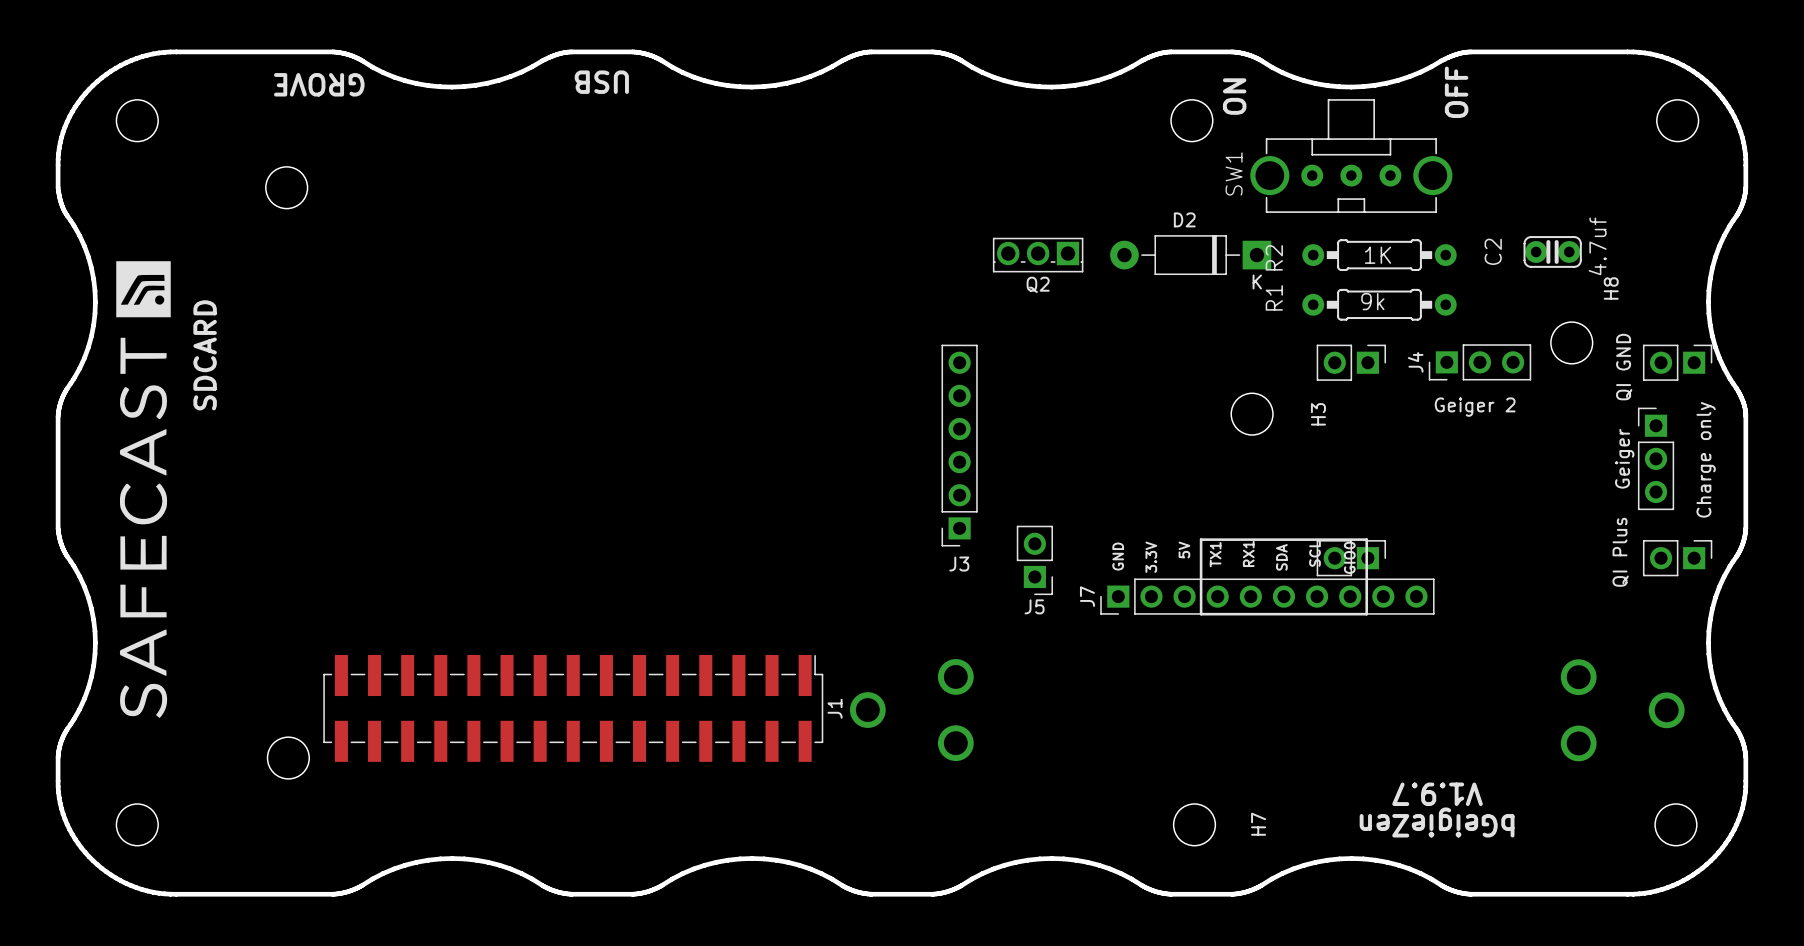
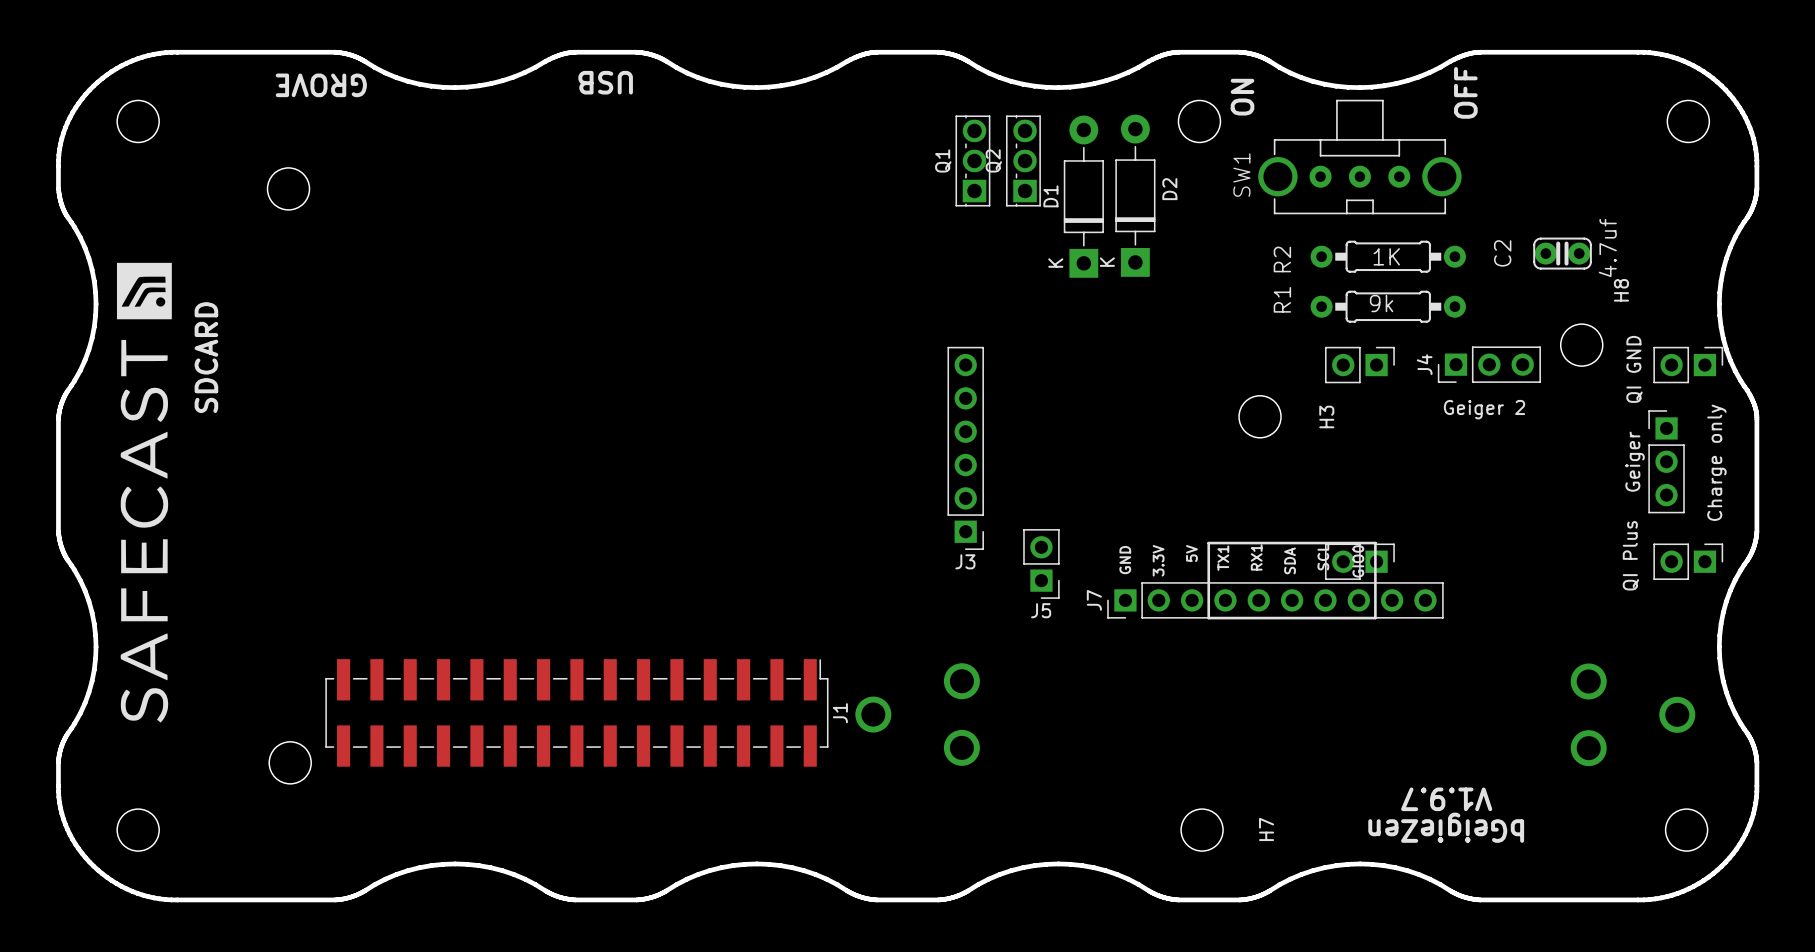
Q1: none -> (972, 160)
D1: none -> (1083, 196)
Q2 rotation: 0° (1038, 255) -> 90° clockwise (1023, 160)
Q2 position: (1038, 255) -> (1023, 160)
D2 rotation: 0° (1190, 255) -> 90° clockwise (1135, 195)
J3 footprint: [941, 344, 978, 547] -> [947, 346, 984, 550]

